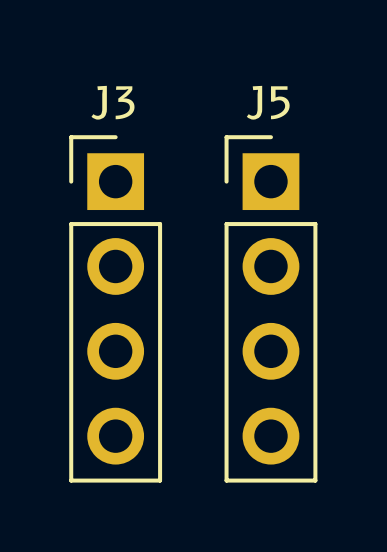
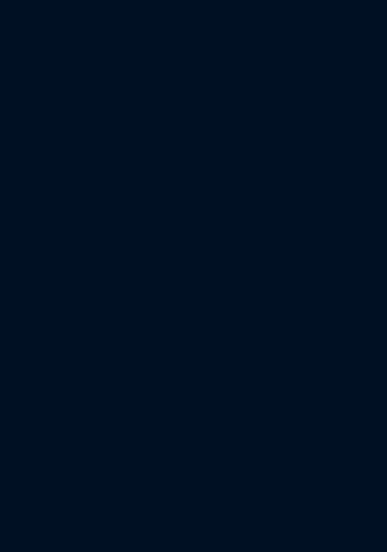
J3: (115, 308) -> none
J5: (270, 308) -> none

